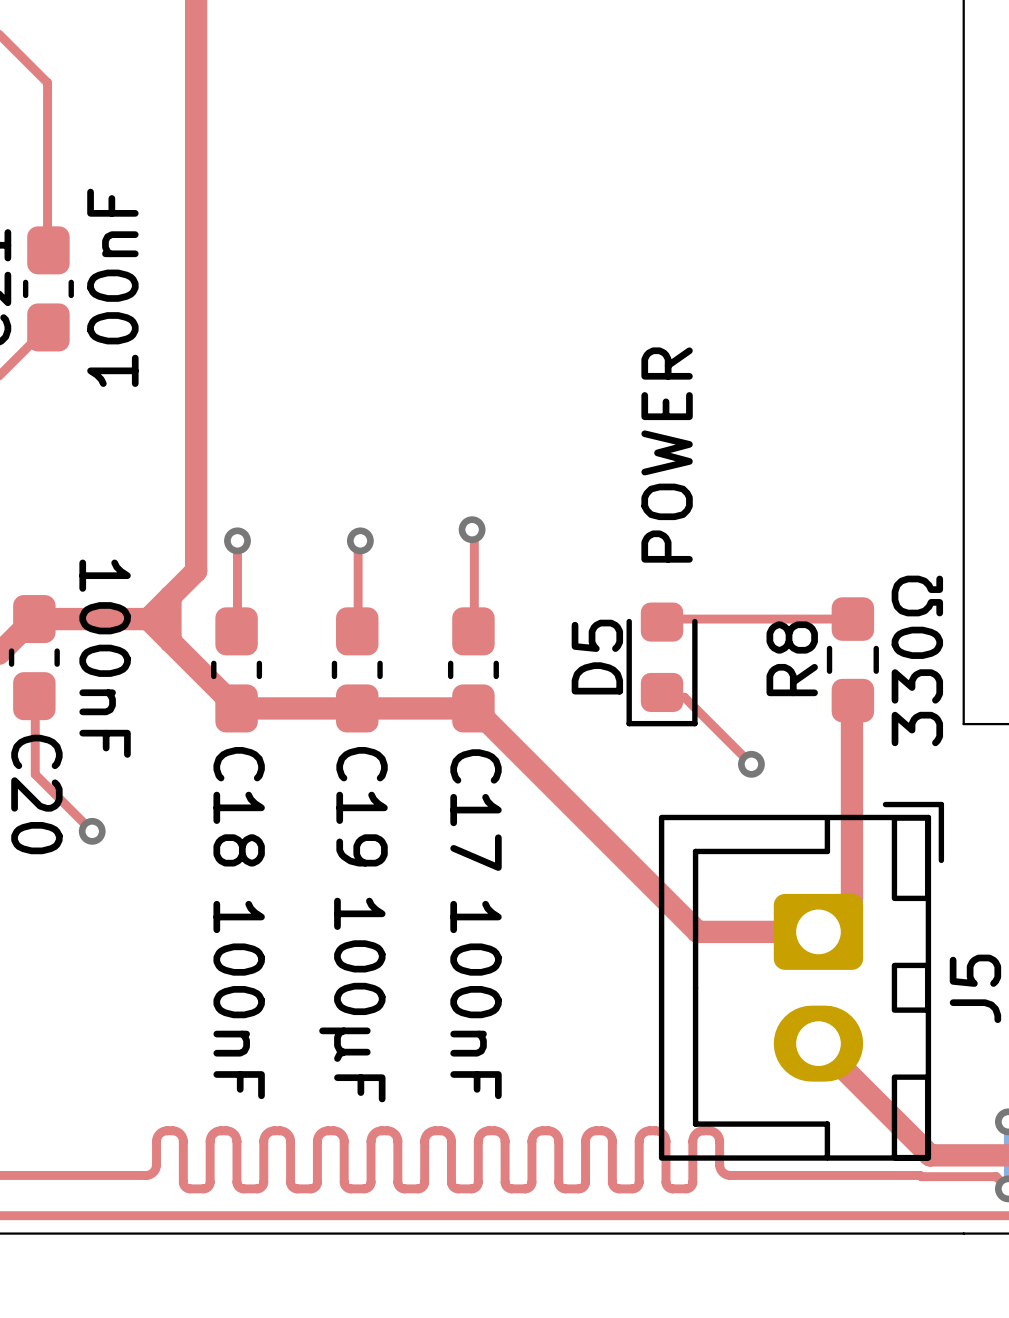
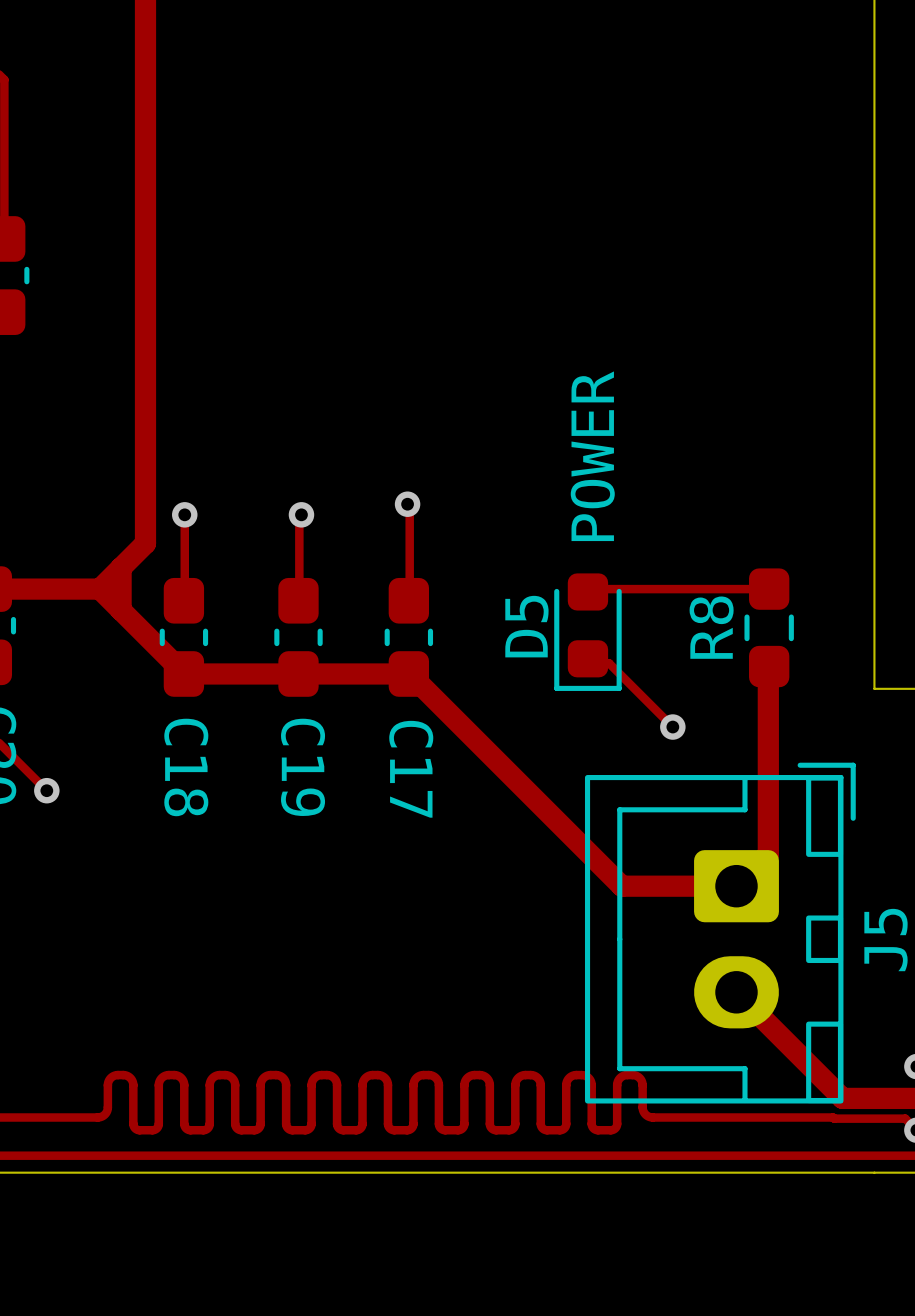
text: 100nF (112, 287) -> none
text: 100nF (105, 658) -> none
text: 330Ω (917, 660) -> none
text: 100nF (239, 1000) -> none
text: 100µF (352, 1000) -> none
text: 100nF (476, 1000) -> none

